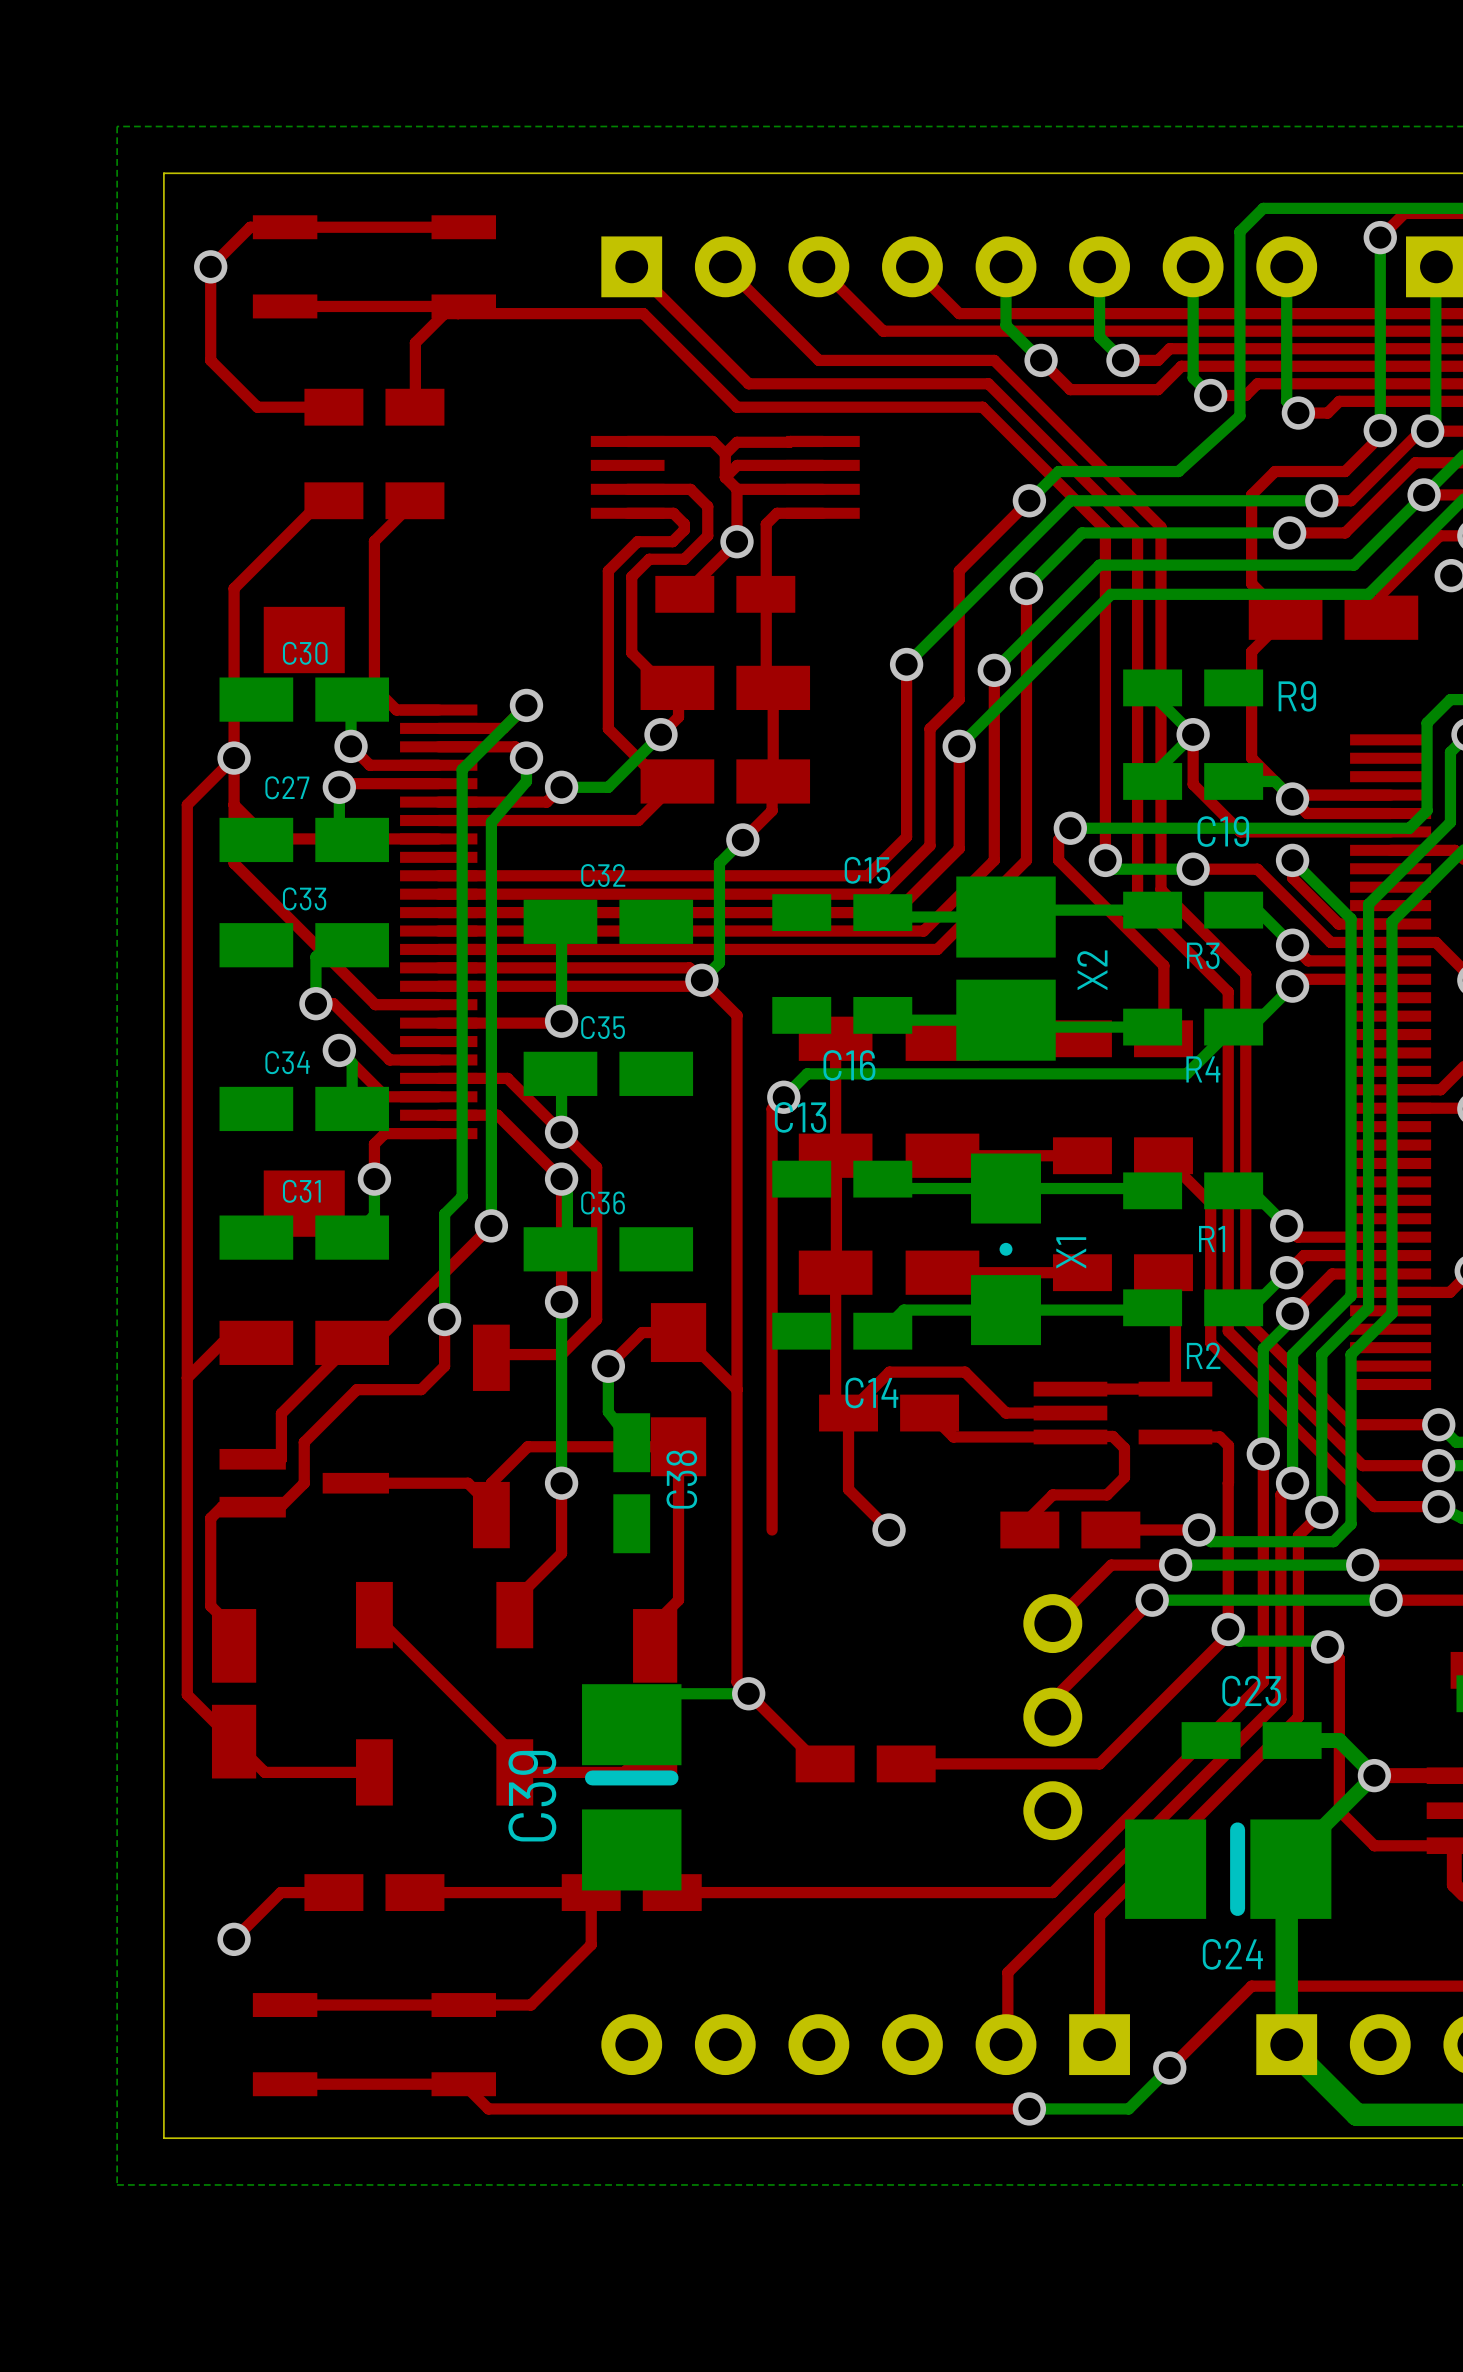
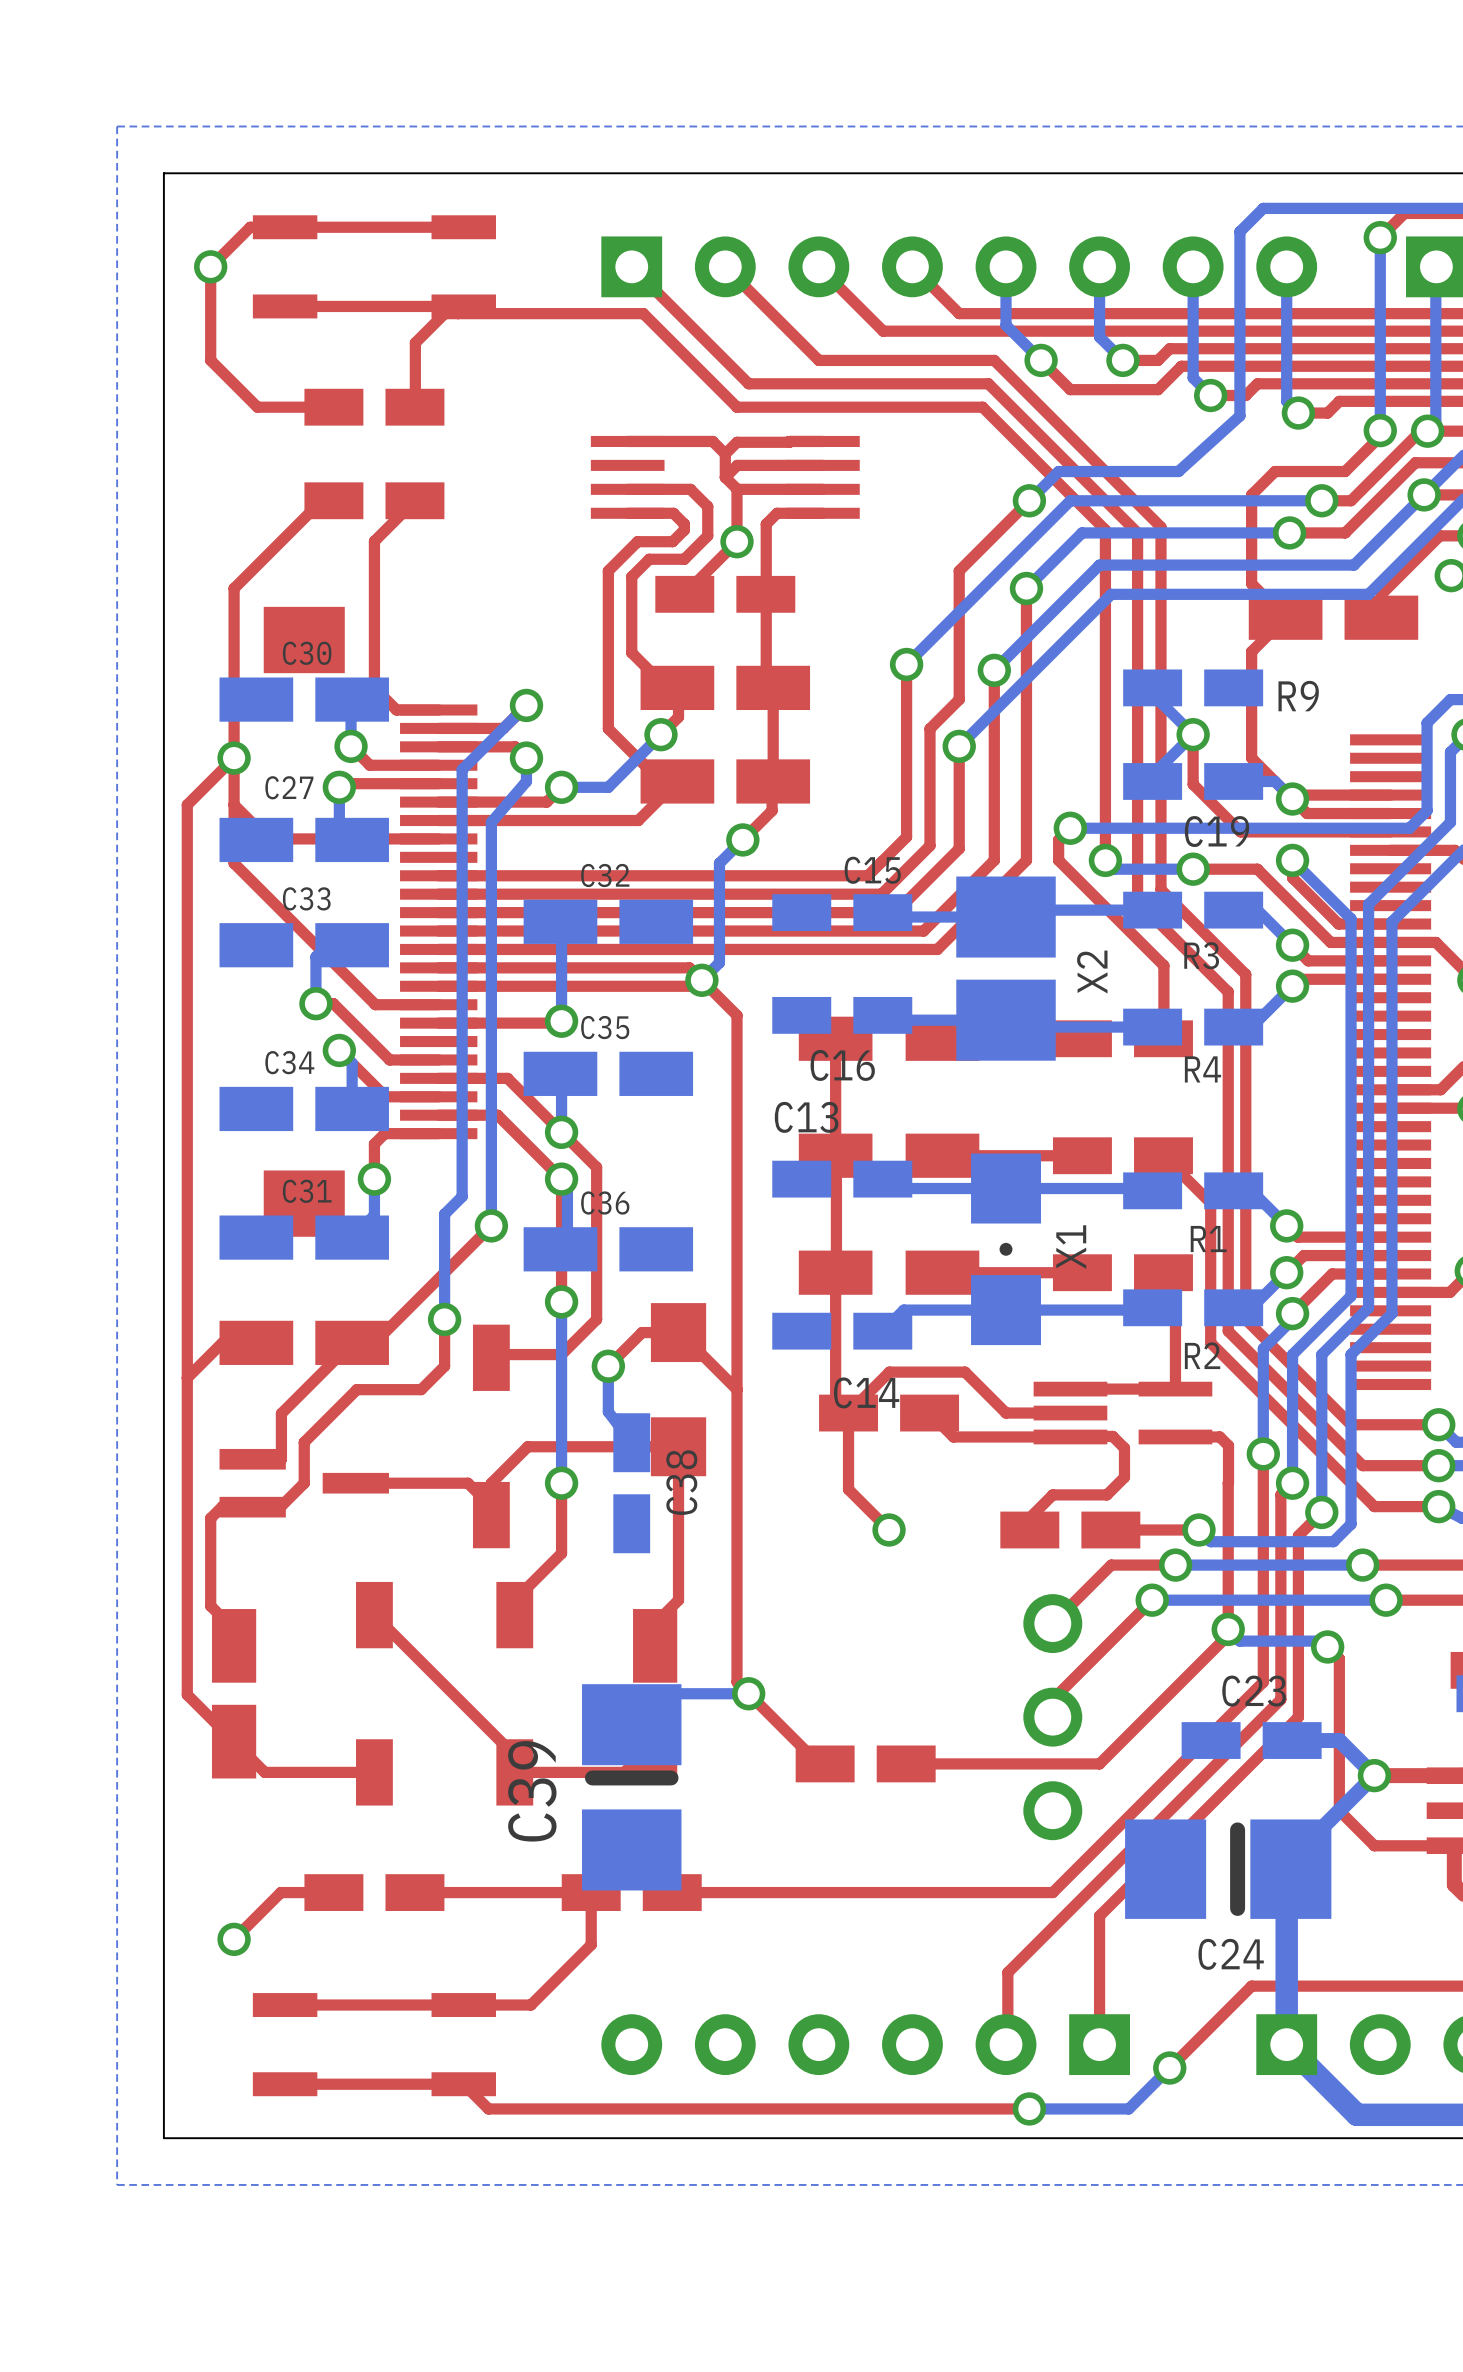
bottom track: (1233, 1027) (1186, 1073) (807, 1073) (783, 1097) -> none
top track: (783, 1097) (772, 1108) (772, 1530) -> none
via: (783, 1097) -> none

